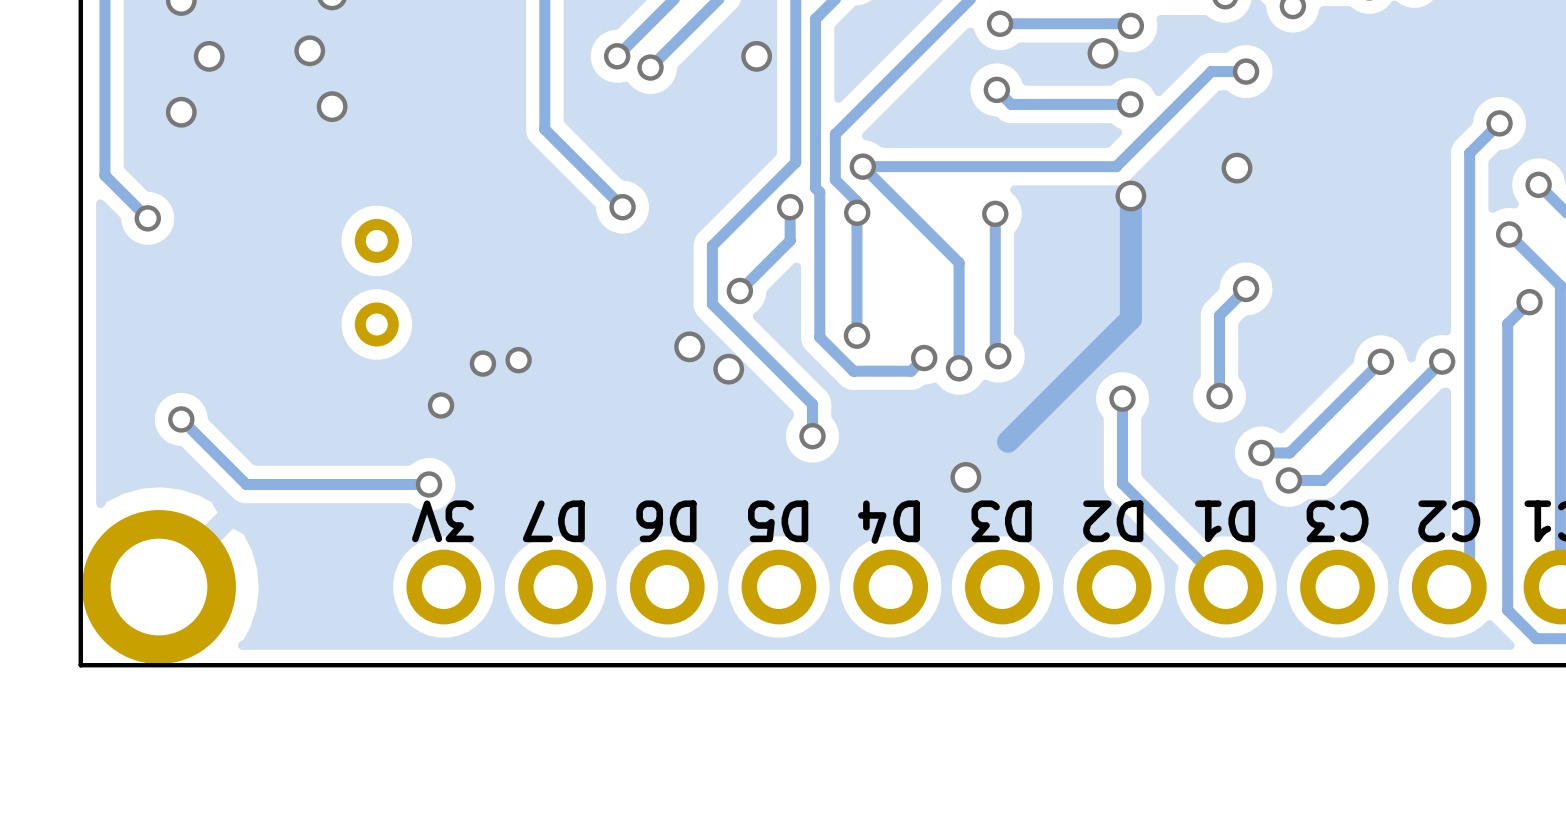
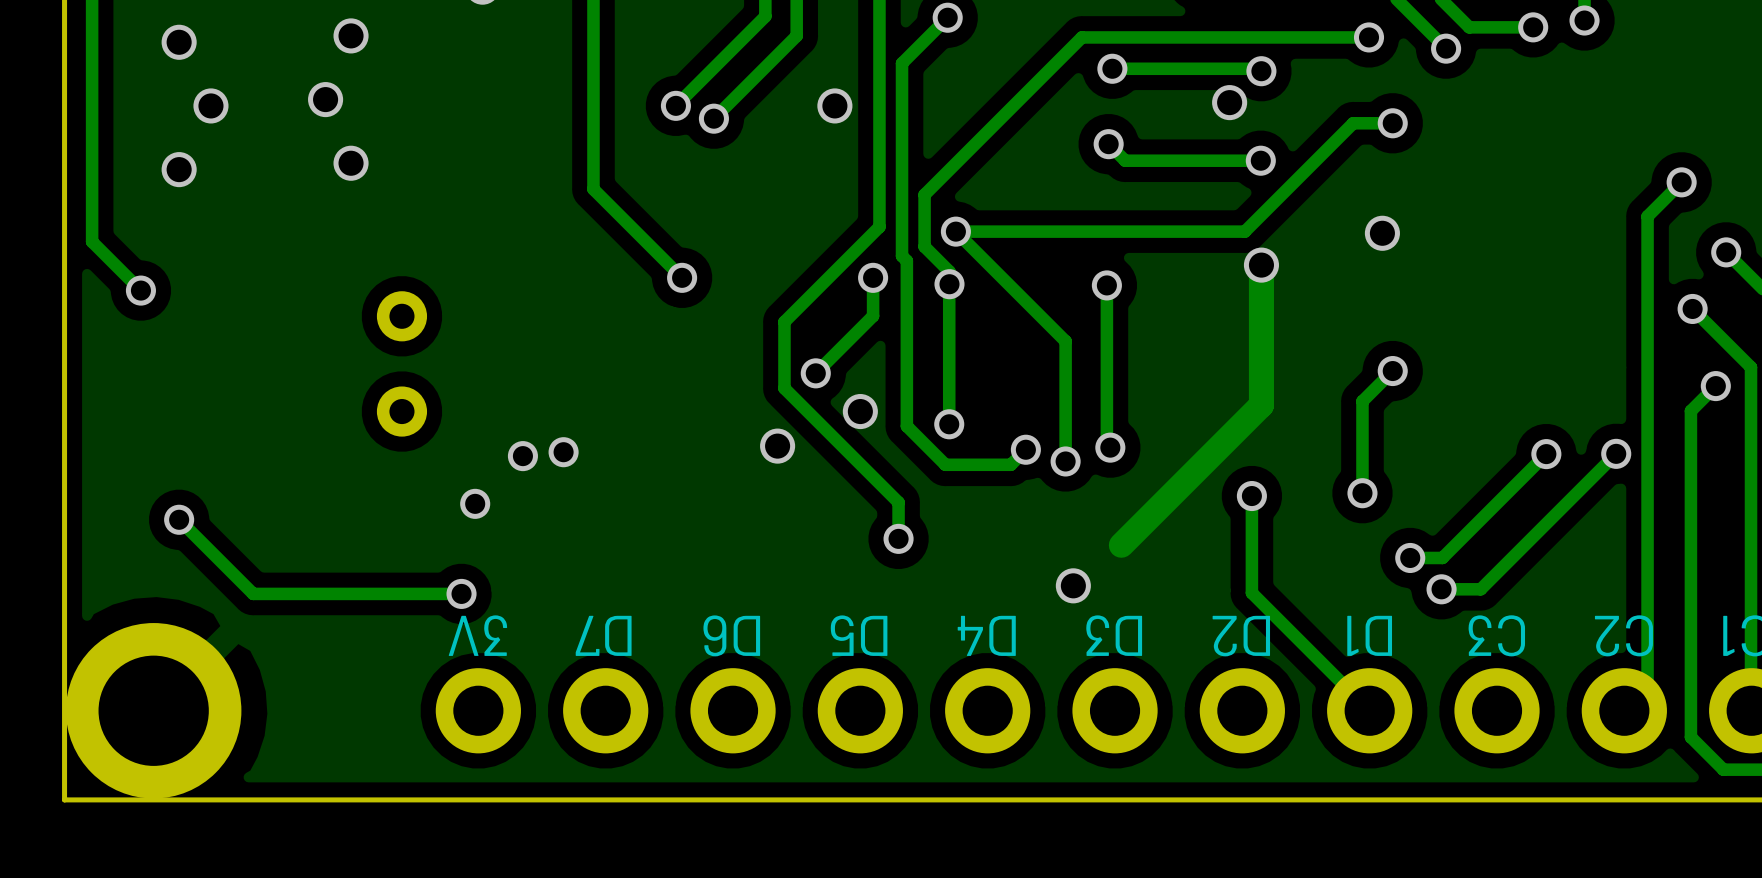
via: none -> (860, 411)
via: (689, 346) -> none
via: none -> (777, 446)
via: (728, 369) -> none

